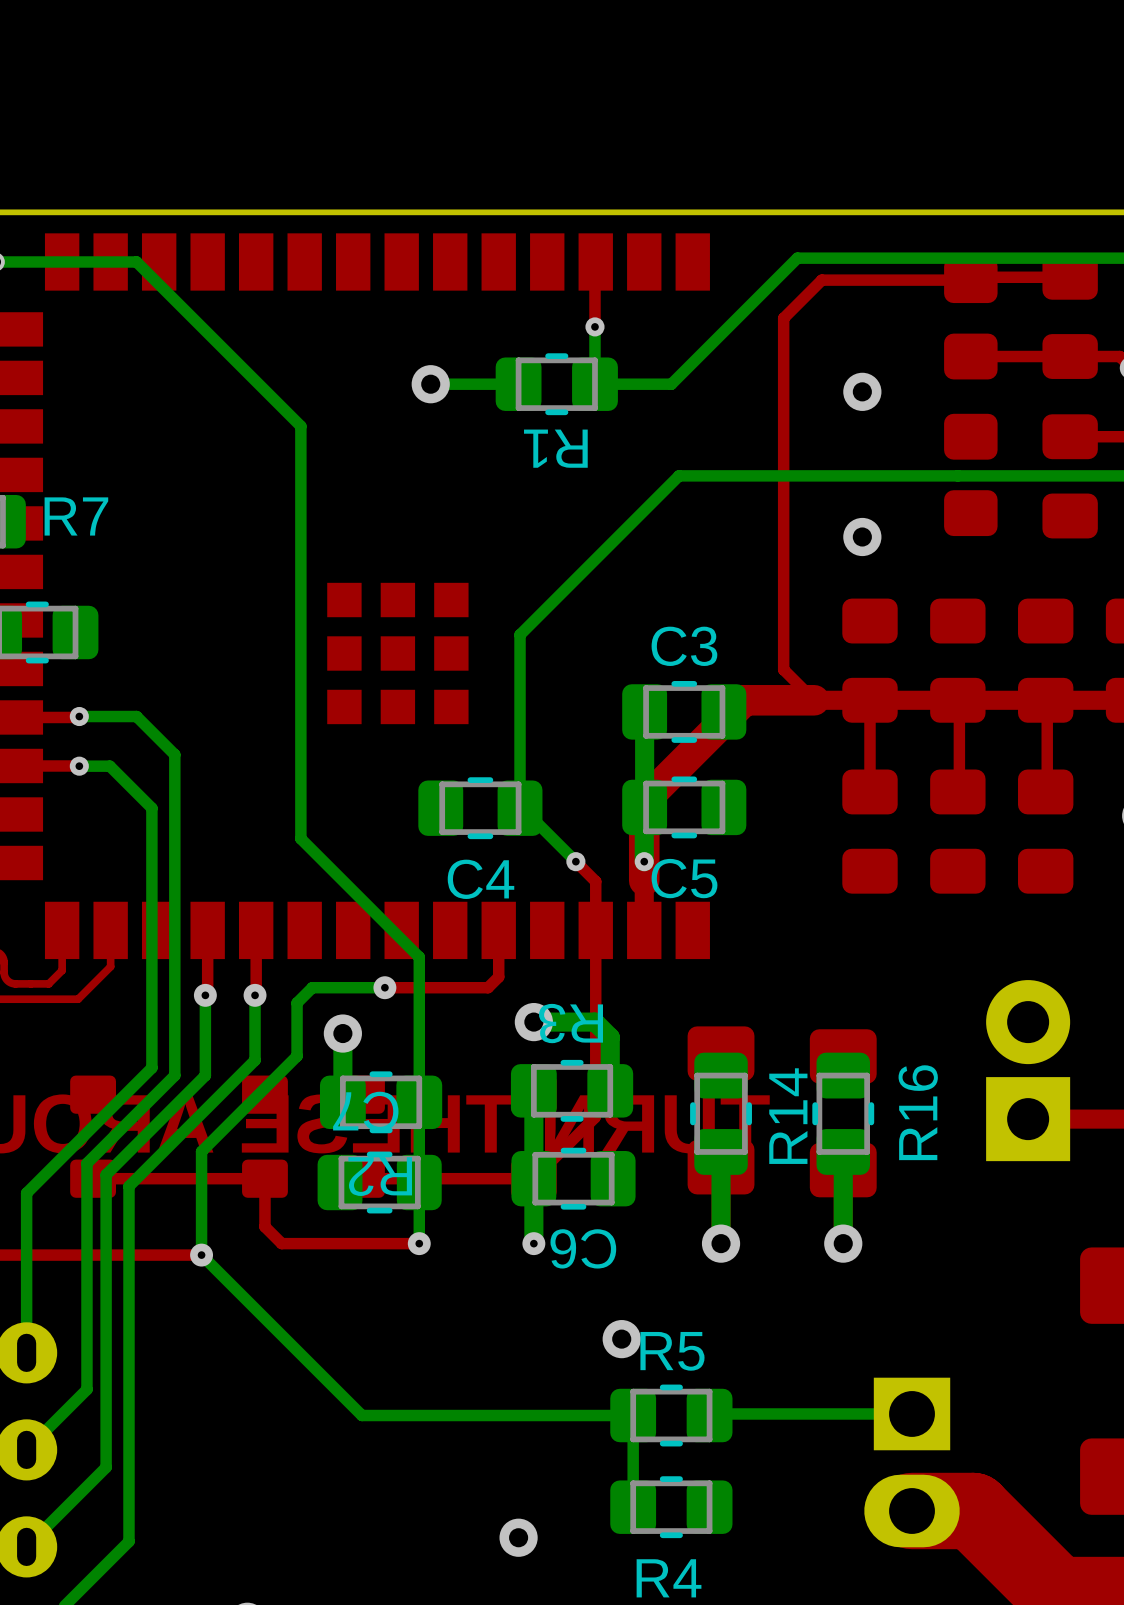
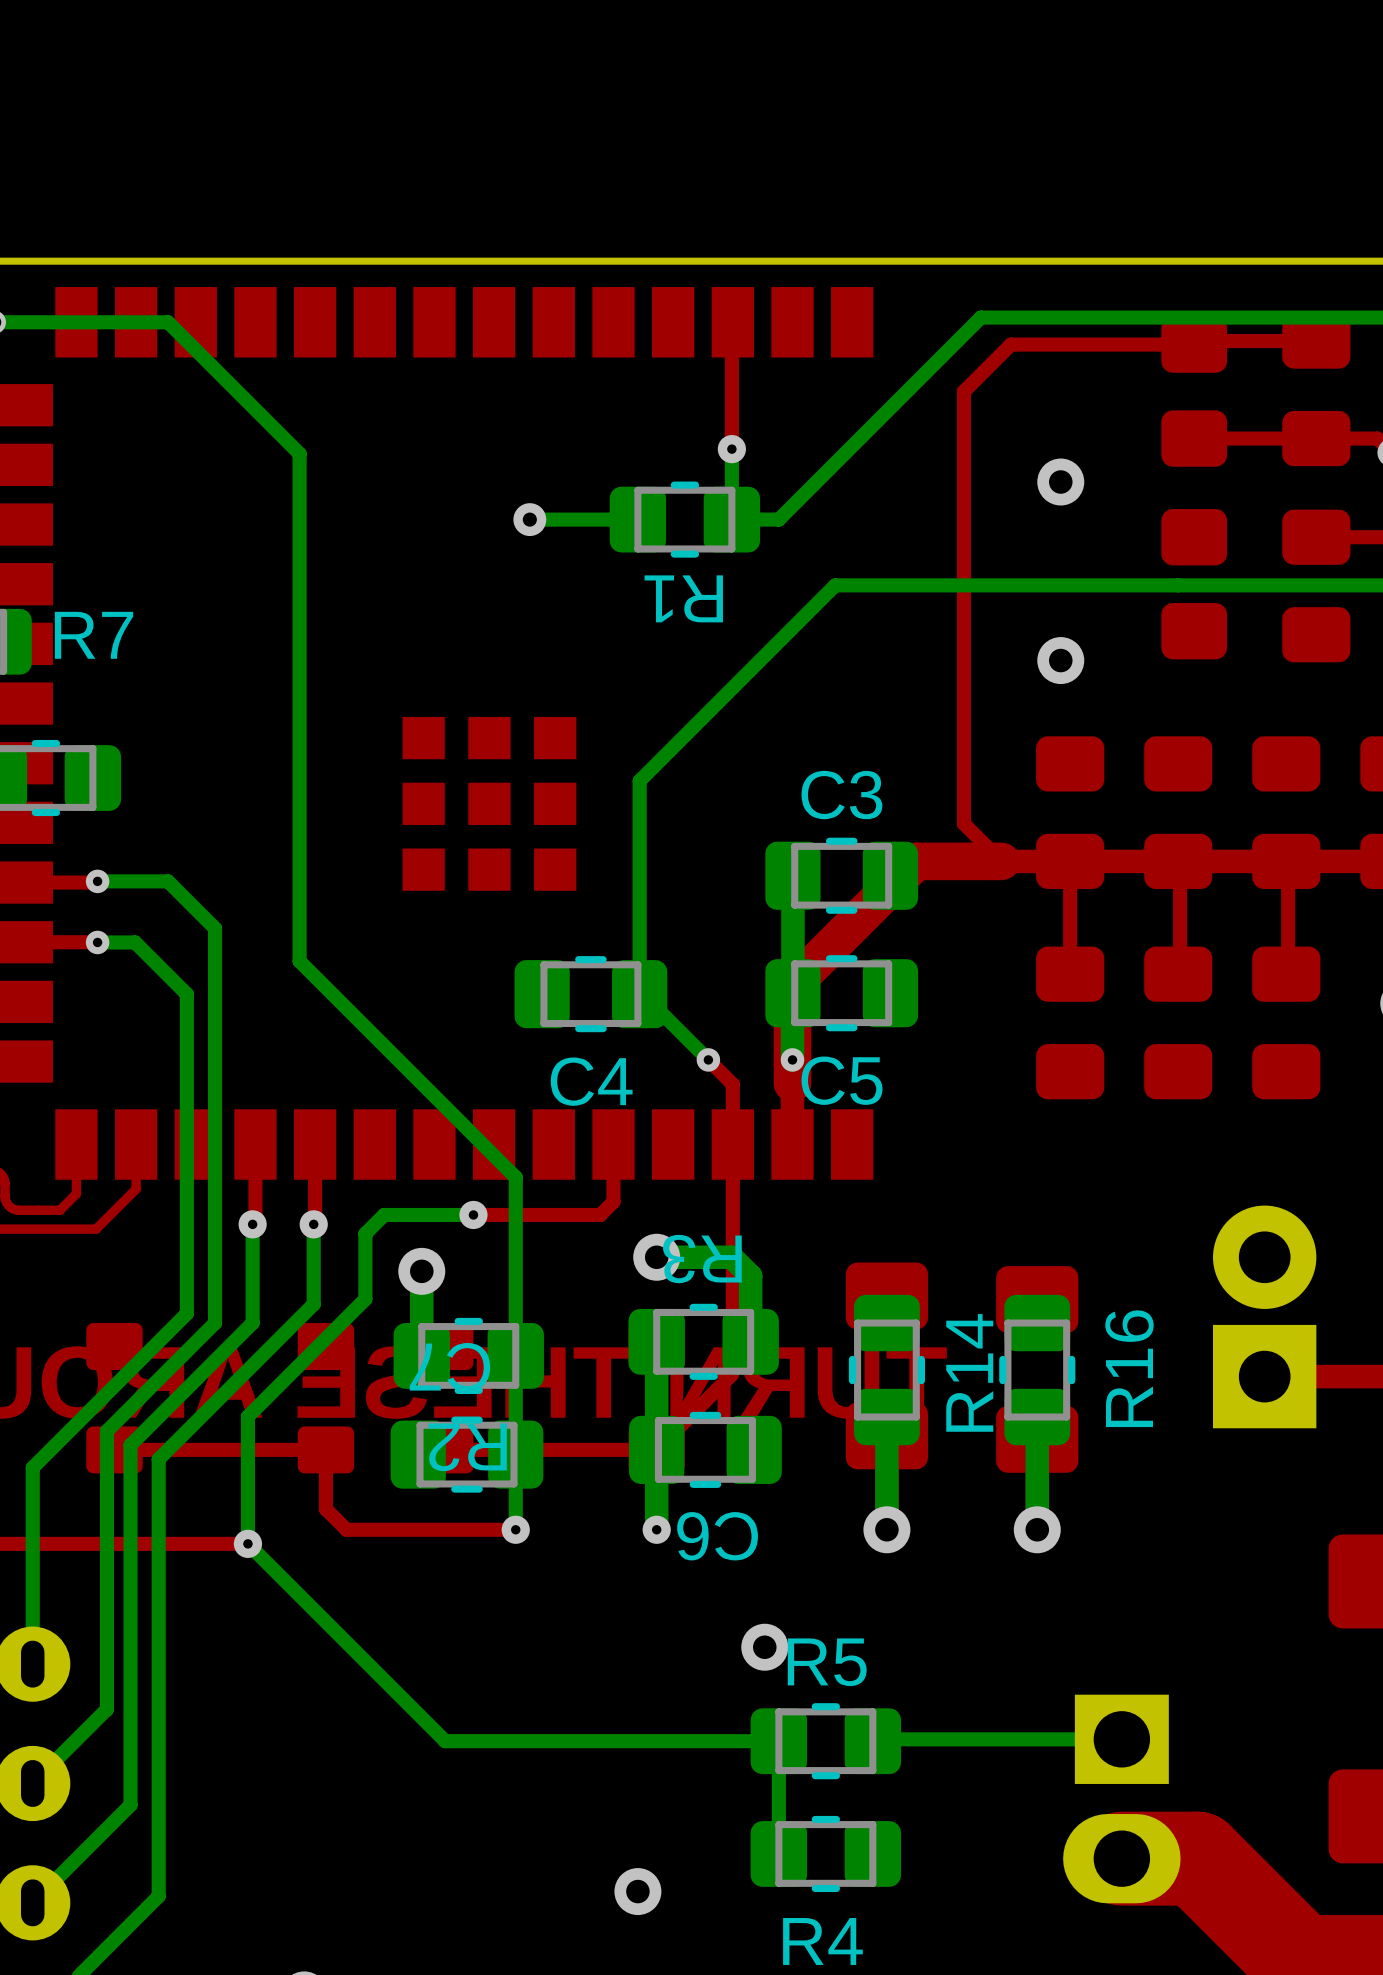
top track: none -> (731, 402) (731, 453)
bottom track: (594, 326) (594, 365) -> none
via: (594, 326) -> none
via: none -> (731, 449)
bottom track: (243, 368) (300, 426) (300, 838) -> (299, 453) (299, 961) (370, 1031)
via: (430, 384) -> none
bottom track: (518, 384) (430, 384) -> (637, 519) (529, 519)
R1 position: (556, 384) -> (684, 519)
bottom track: (671, 384) (598, 384) -> (825, 472) (778, 519) (731, 519) (731, 472)
via: none -> (529, 519)

